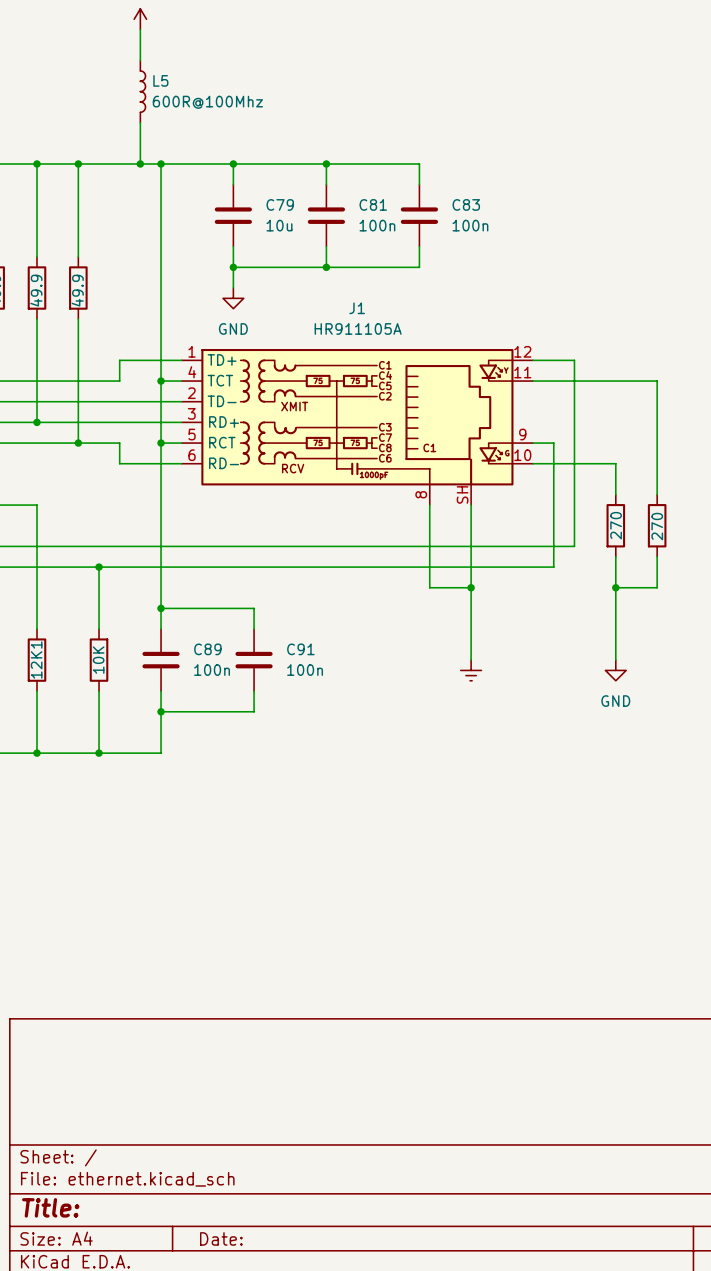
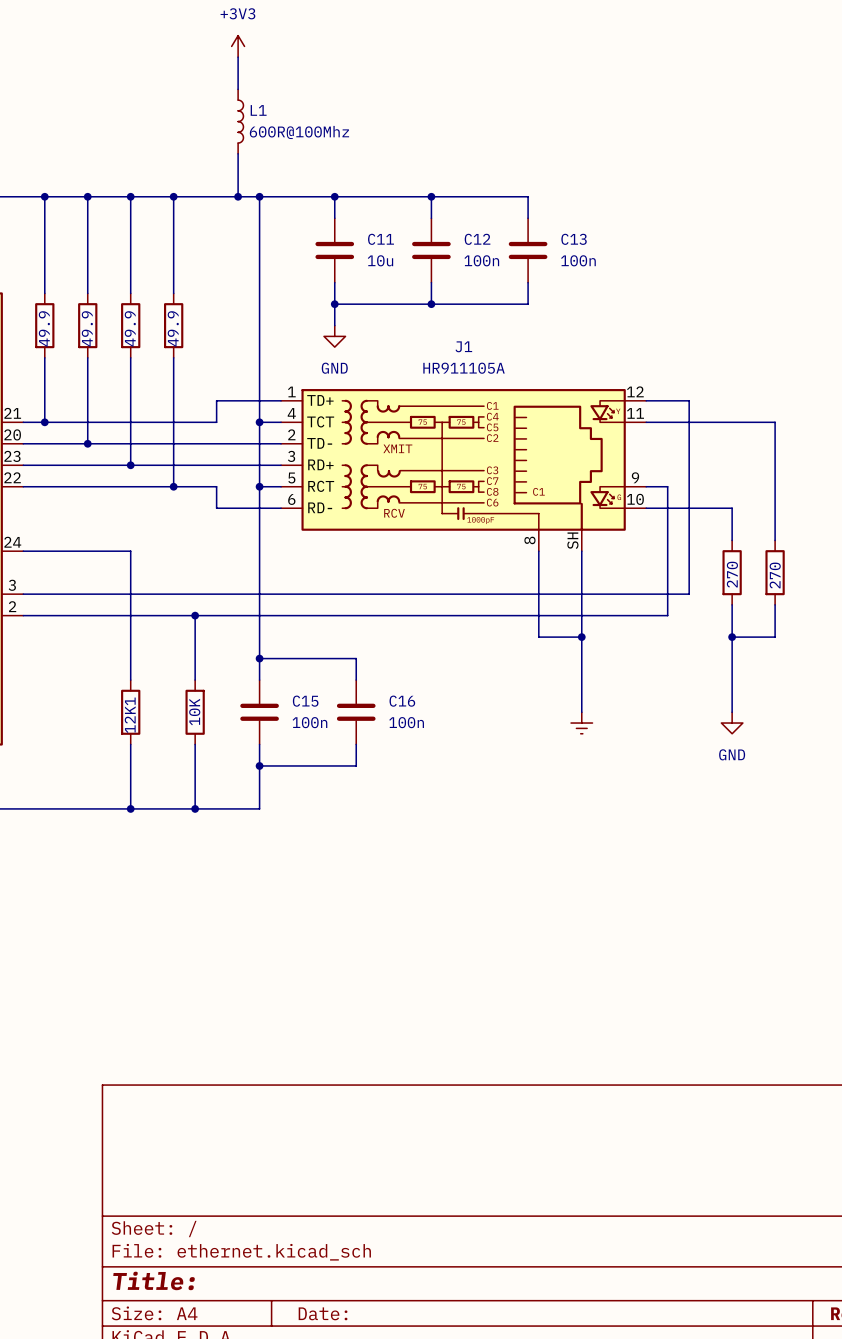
L5 name: L5 (160, 80) -> L1 (258, 110)
C79 name: C79 (280, 204) -> C11 (381, 239)
C81 name: C81 (373, 204) -> C12 (477, 239)
C83 name: C83 (466, 204) -> C13 (574, 239)
C89 name: C89 (207, 649) -> C15 (305, 701)
C91 name: C91 (300, 649) -> C16 (402, 701)

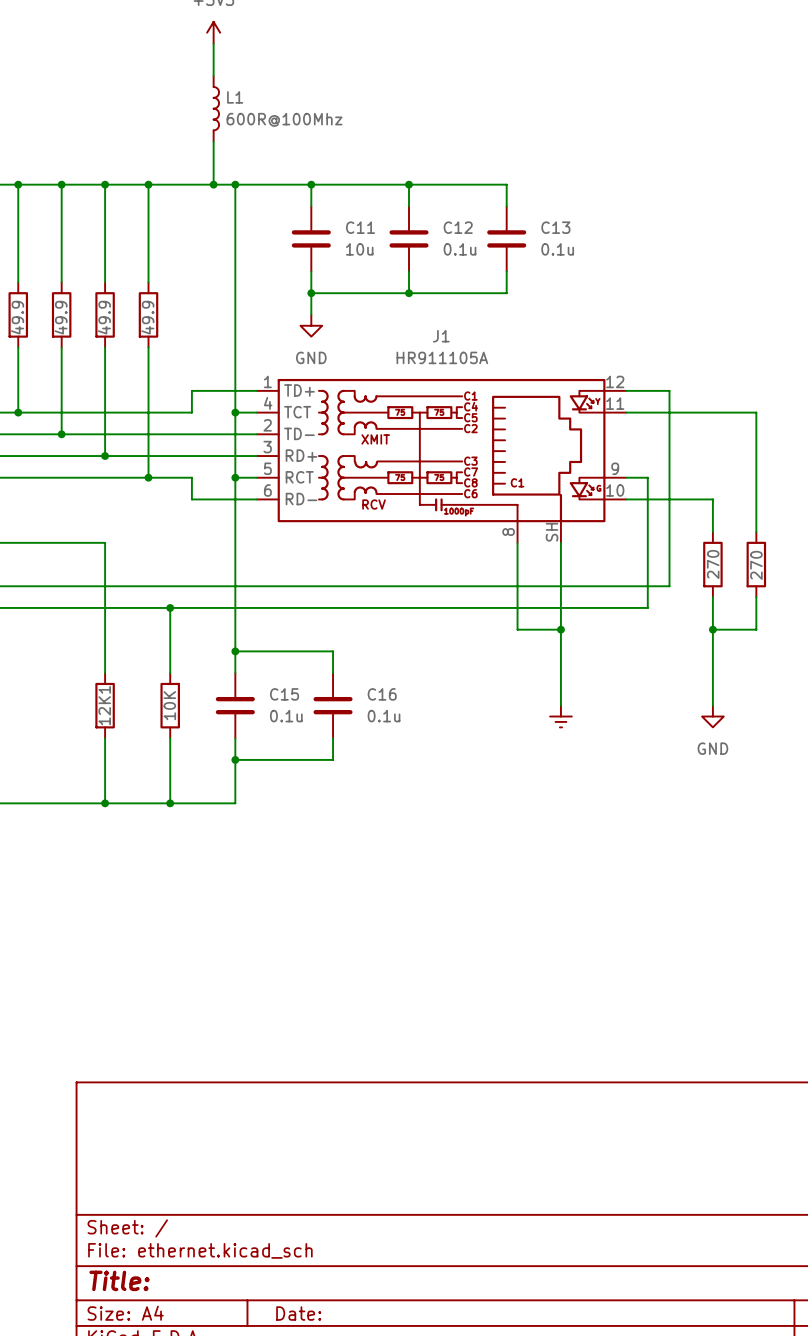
C12 value: 100n (481, 260) -> 0.1u (460, 249)
C13 value: 100n (578, 260) -> 0.1u (557, 249)
C15 value: 100n (309, 722) -> 0.1u (286, 716)
C16 value: 100n (406, 722) -> 0.1u (384, 716)

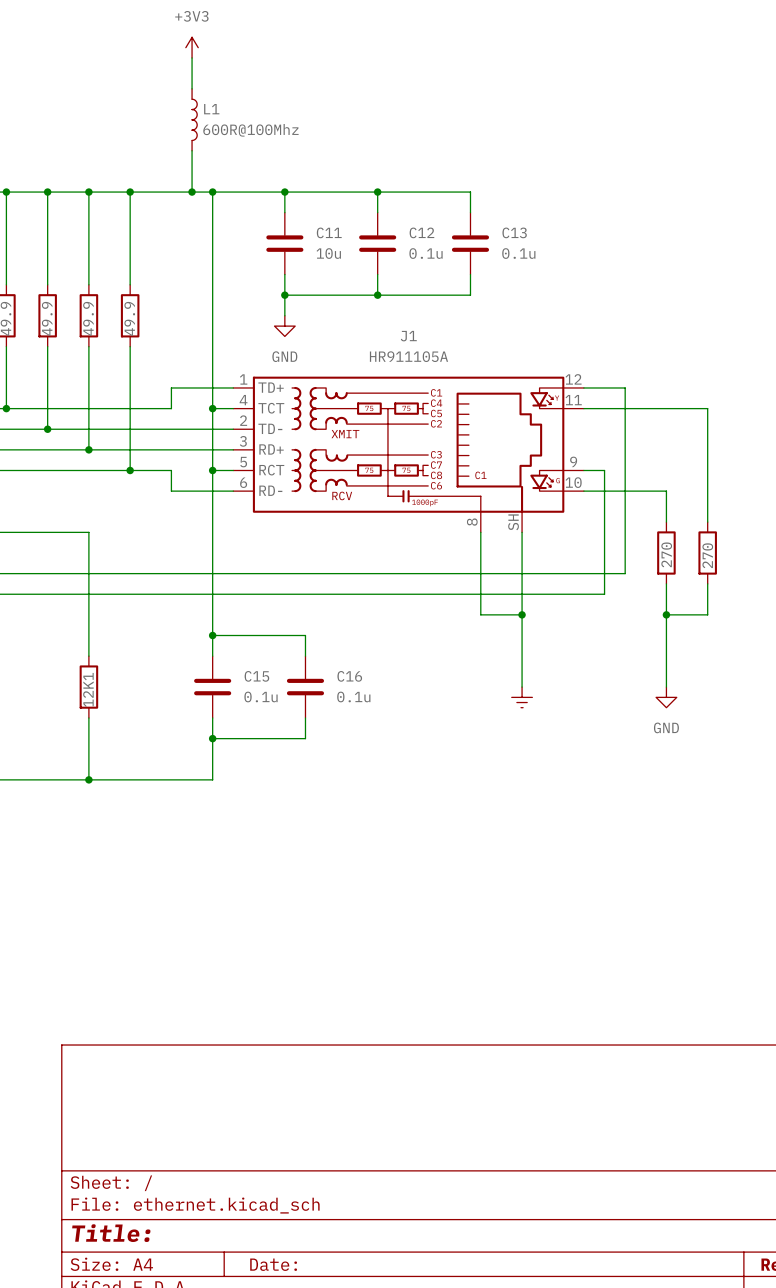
wire: (170, 607) (170, 673) -> none
junction: (170, 607) -> none
part: 10K (170, 705) -> none
wire: (170, 738) (170, 803) -> none
junction: (170, 803) -> none

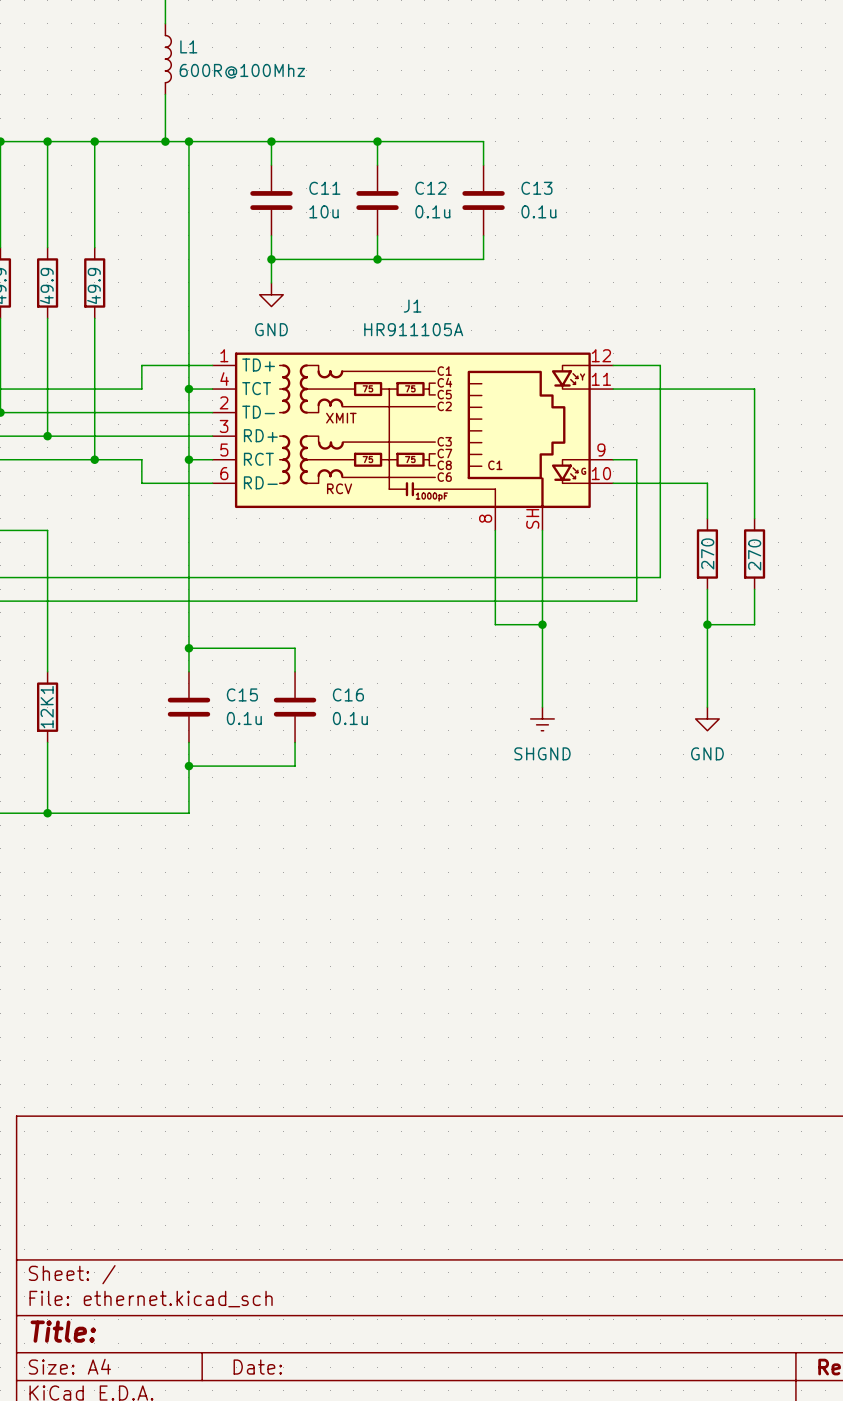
SHGND name: none -> SHGND (542, 753)

